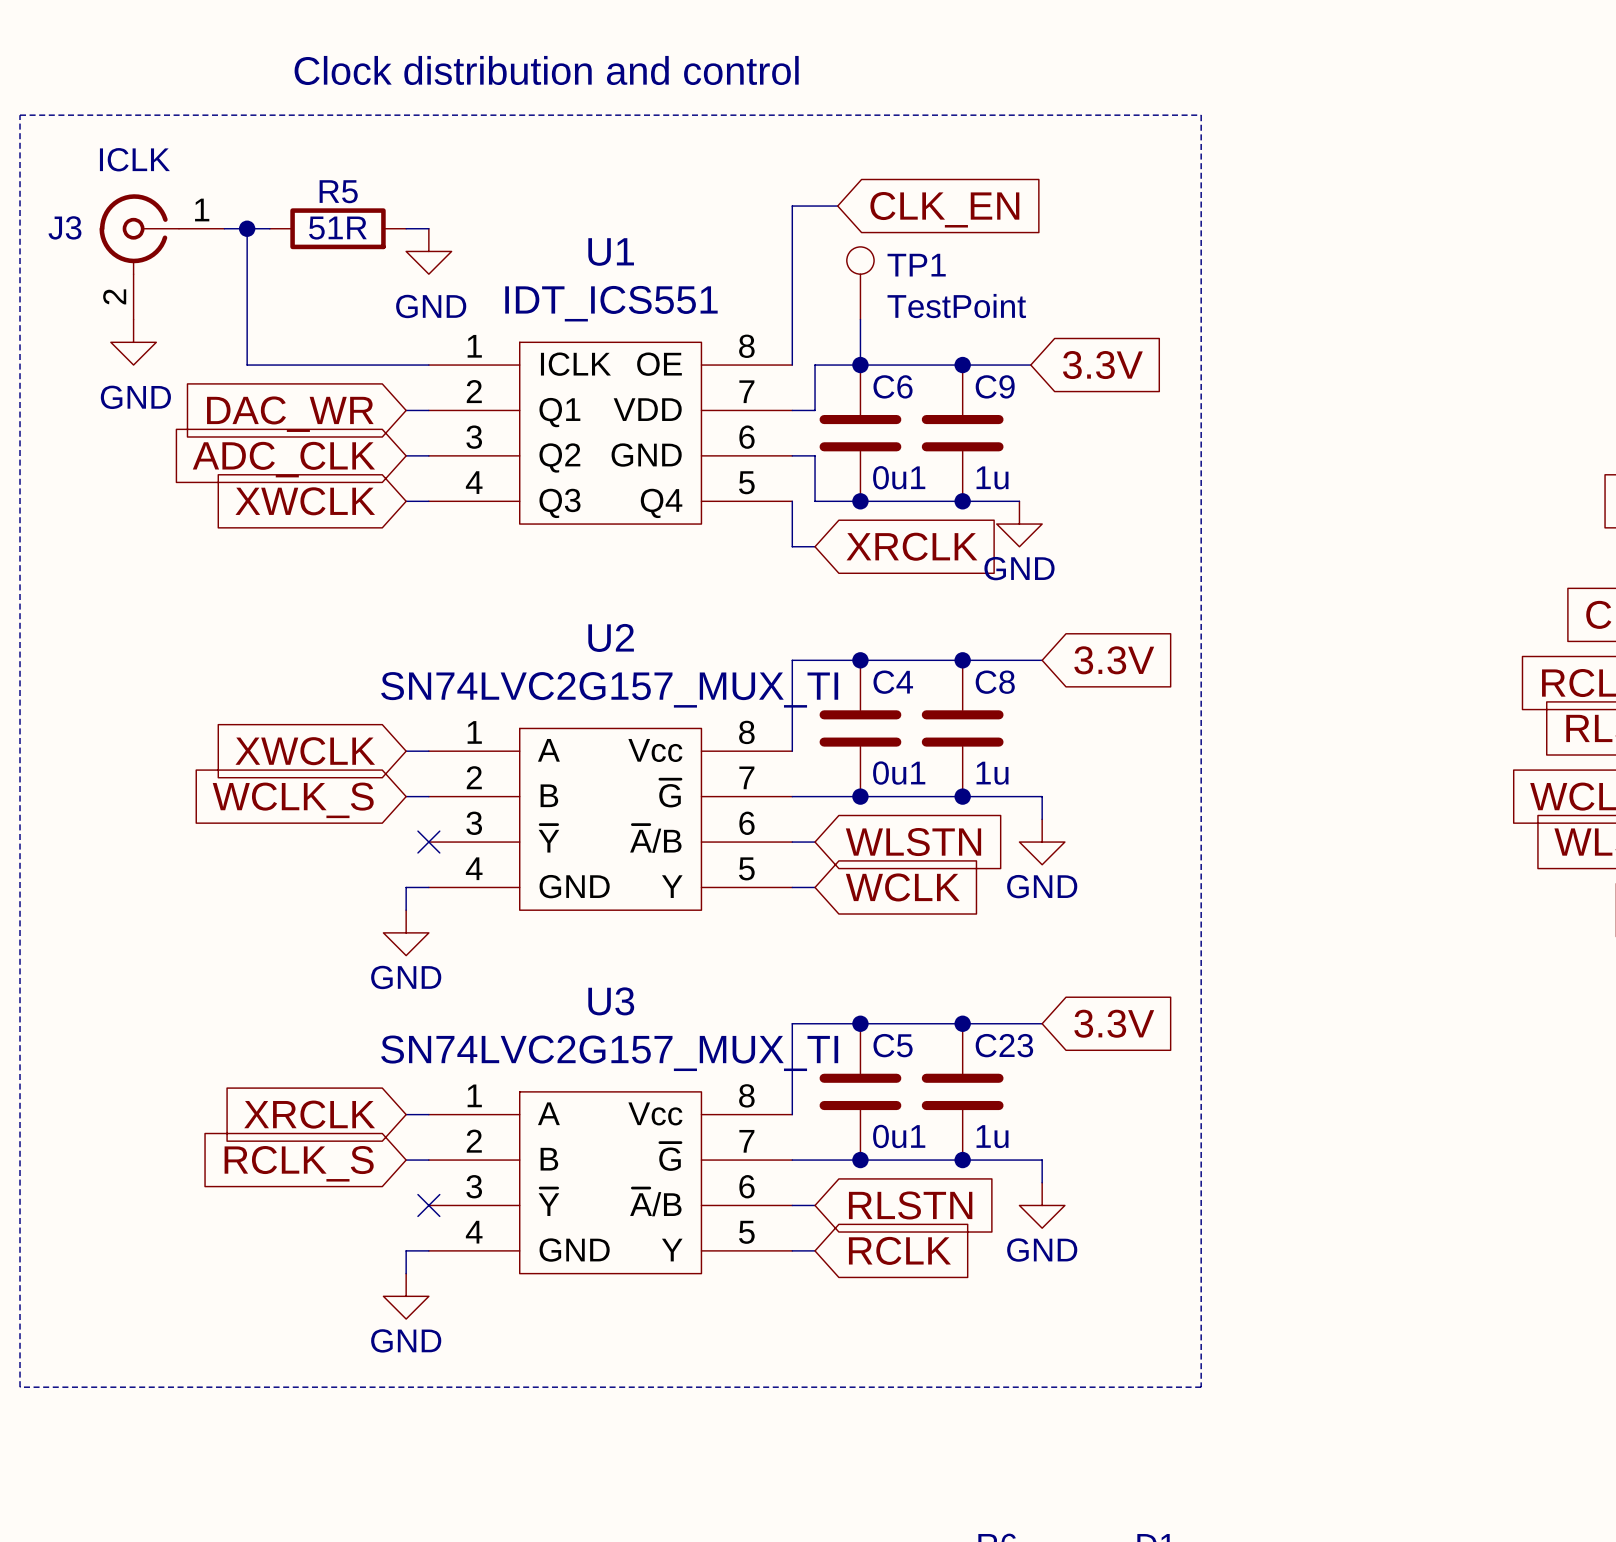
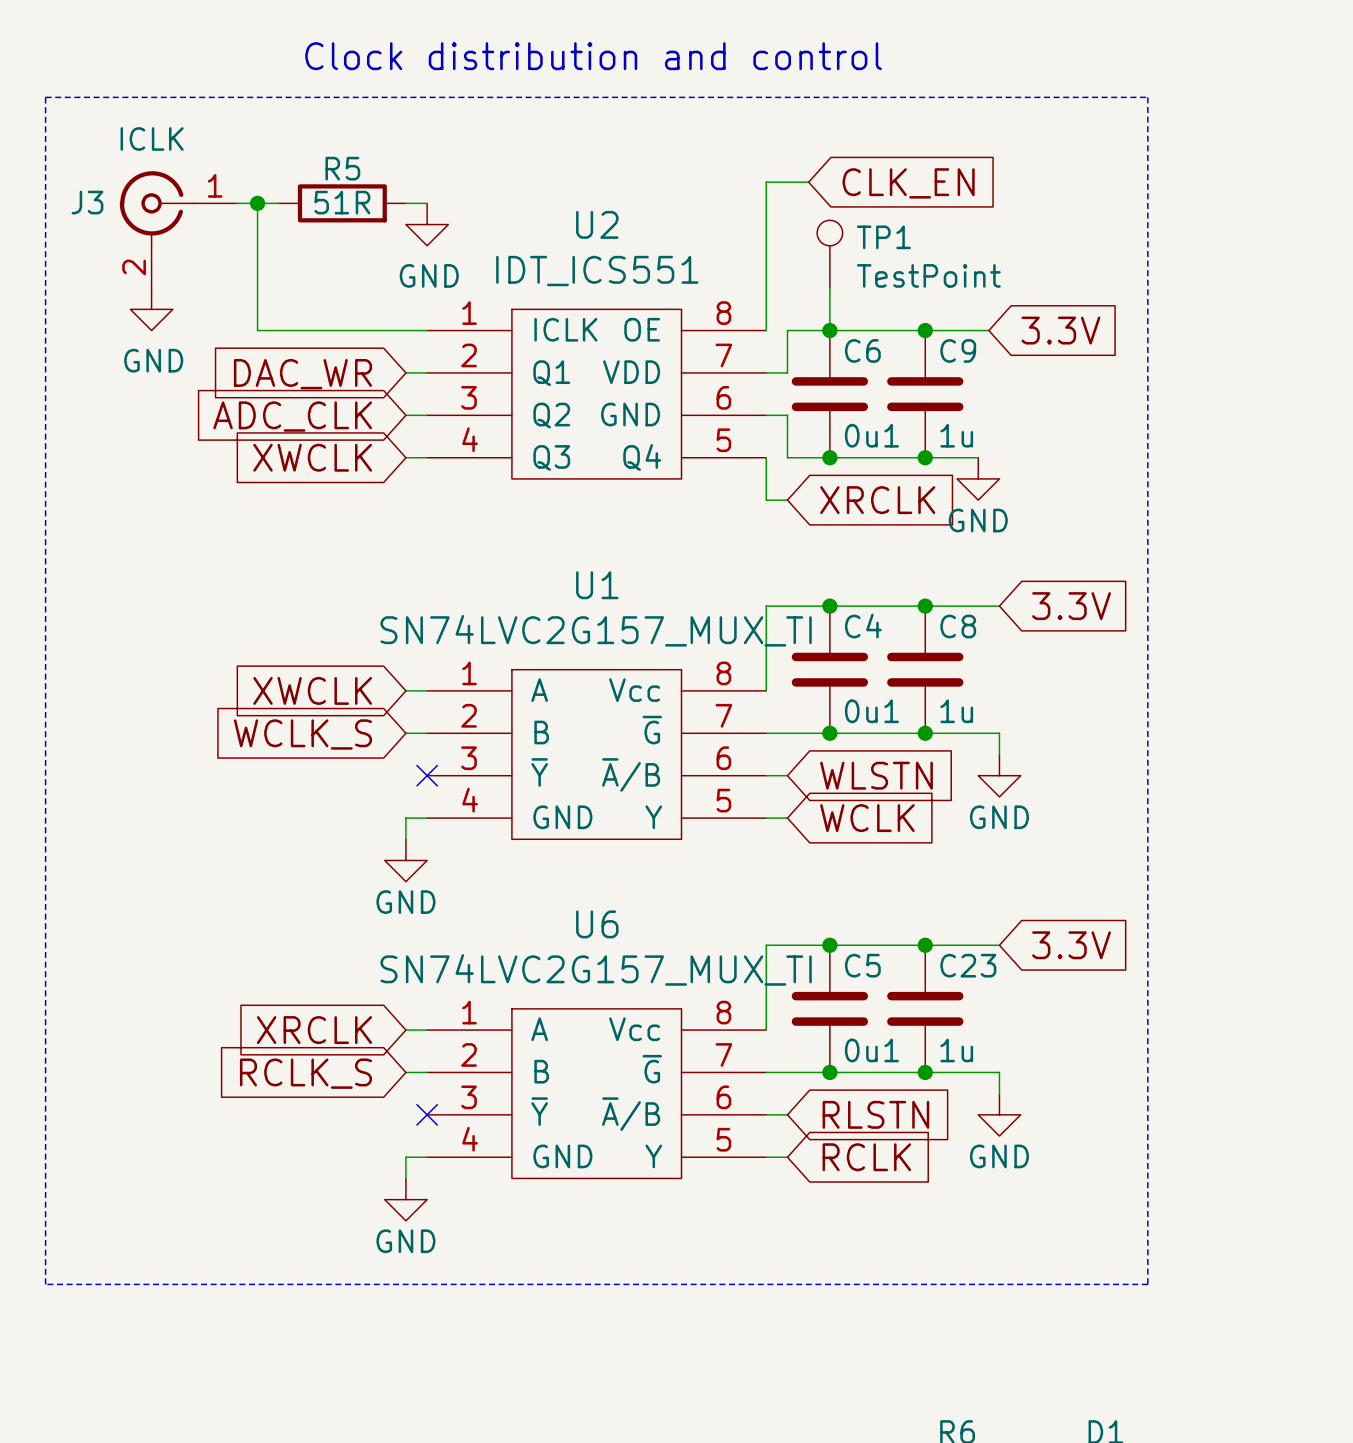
U1 name: U1 (611, 251) -> U2 (597, 224)
U2 name: U2 (611, 637) -> U1 (597, 585)
U3 name: U3 (611, 1001) -> U6 (597, 924)

